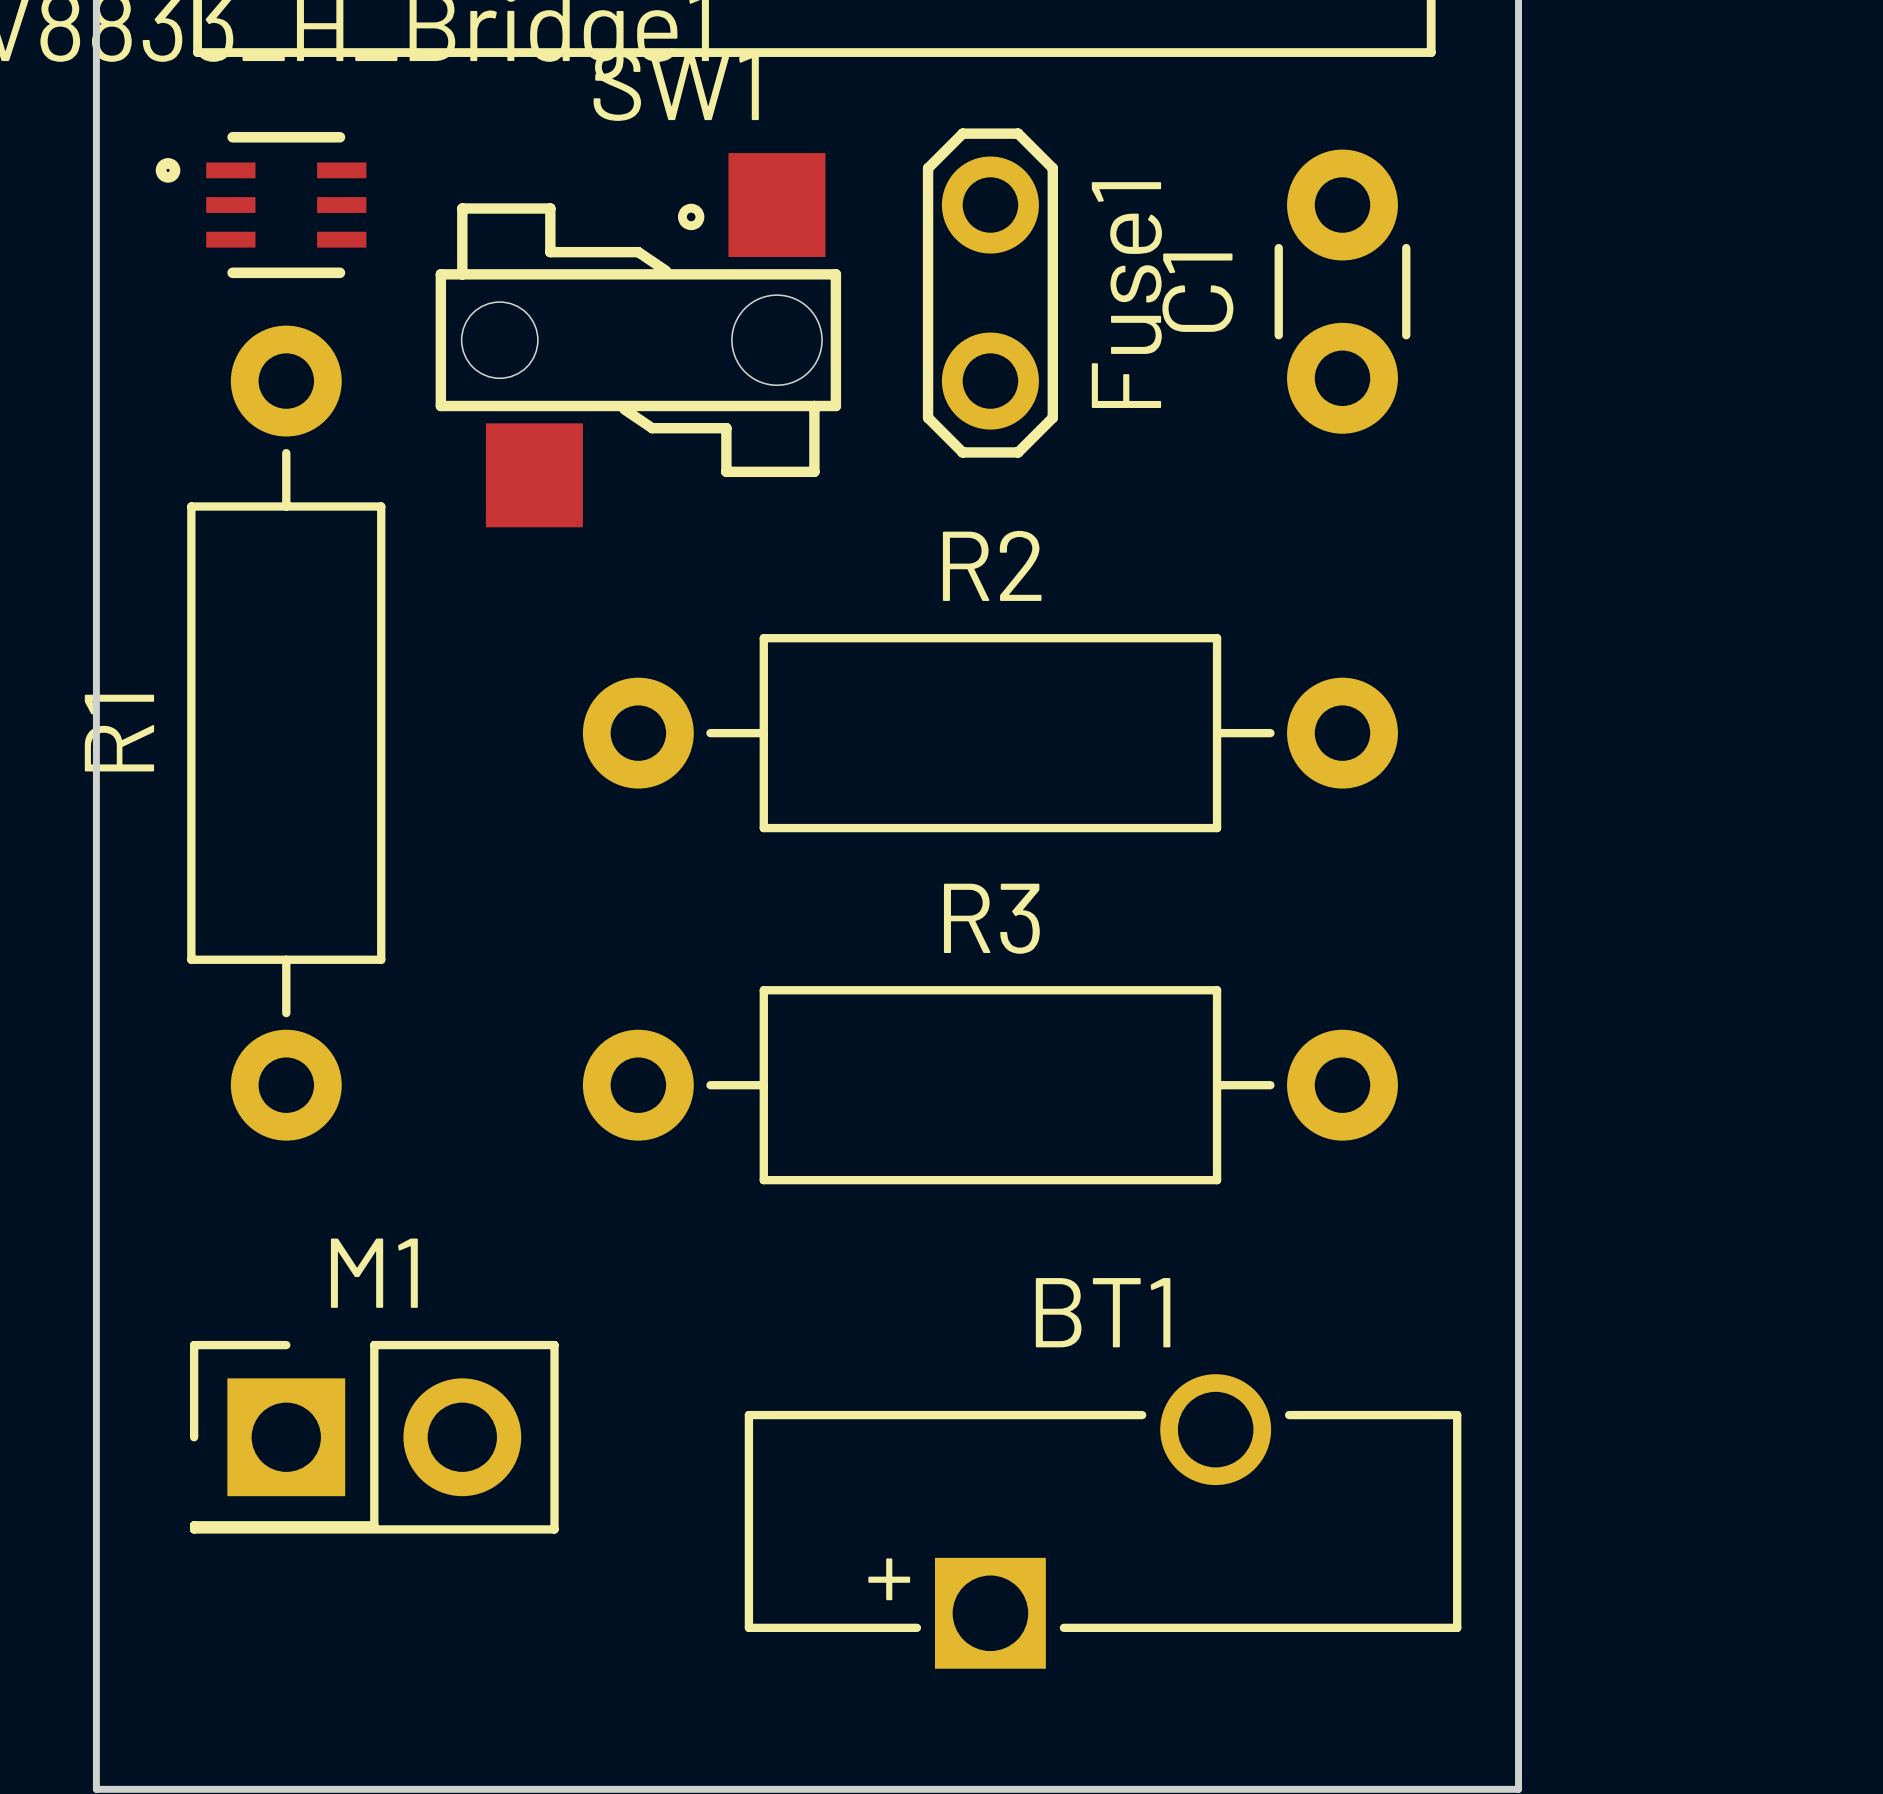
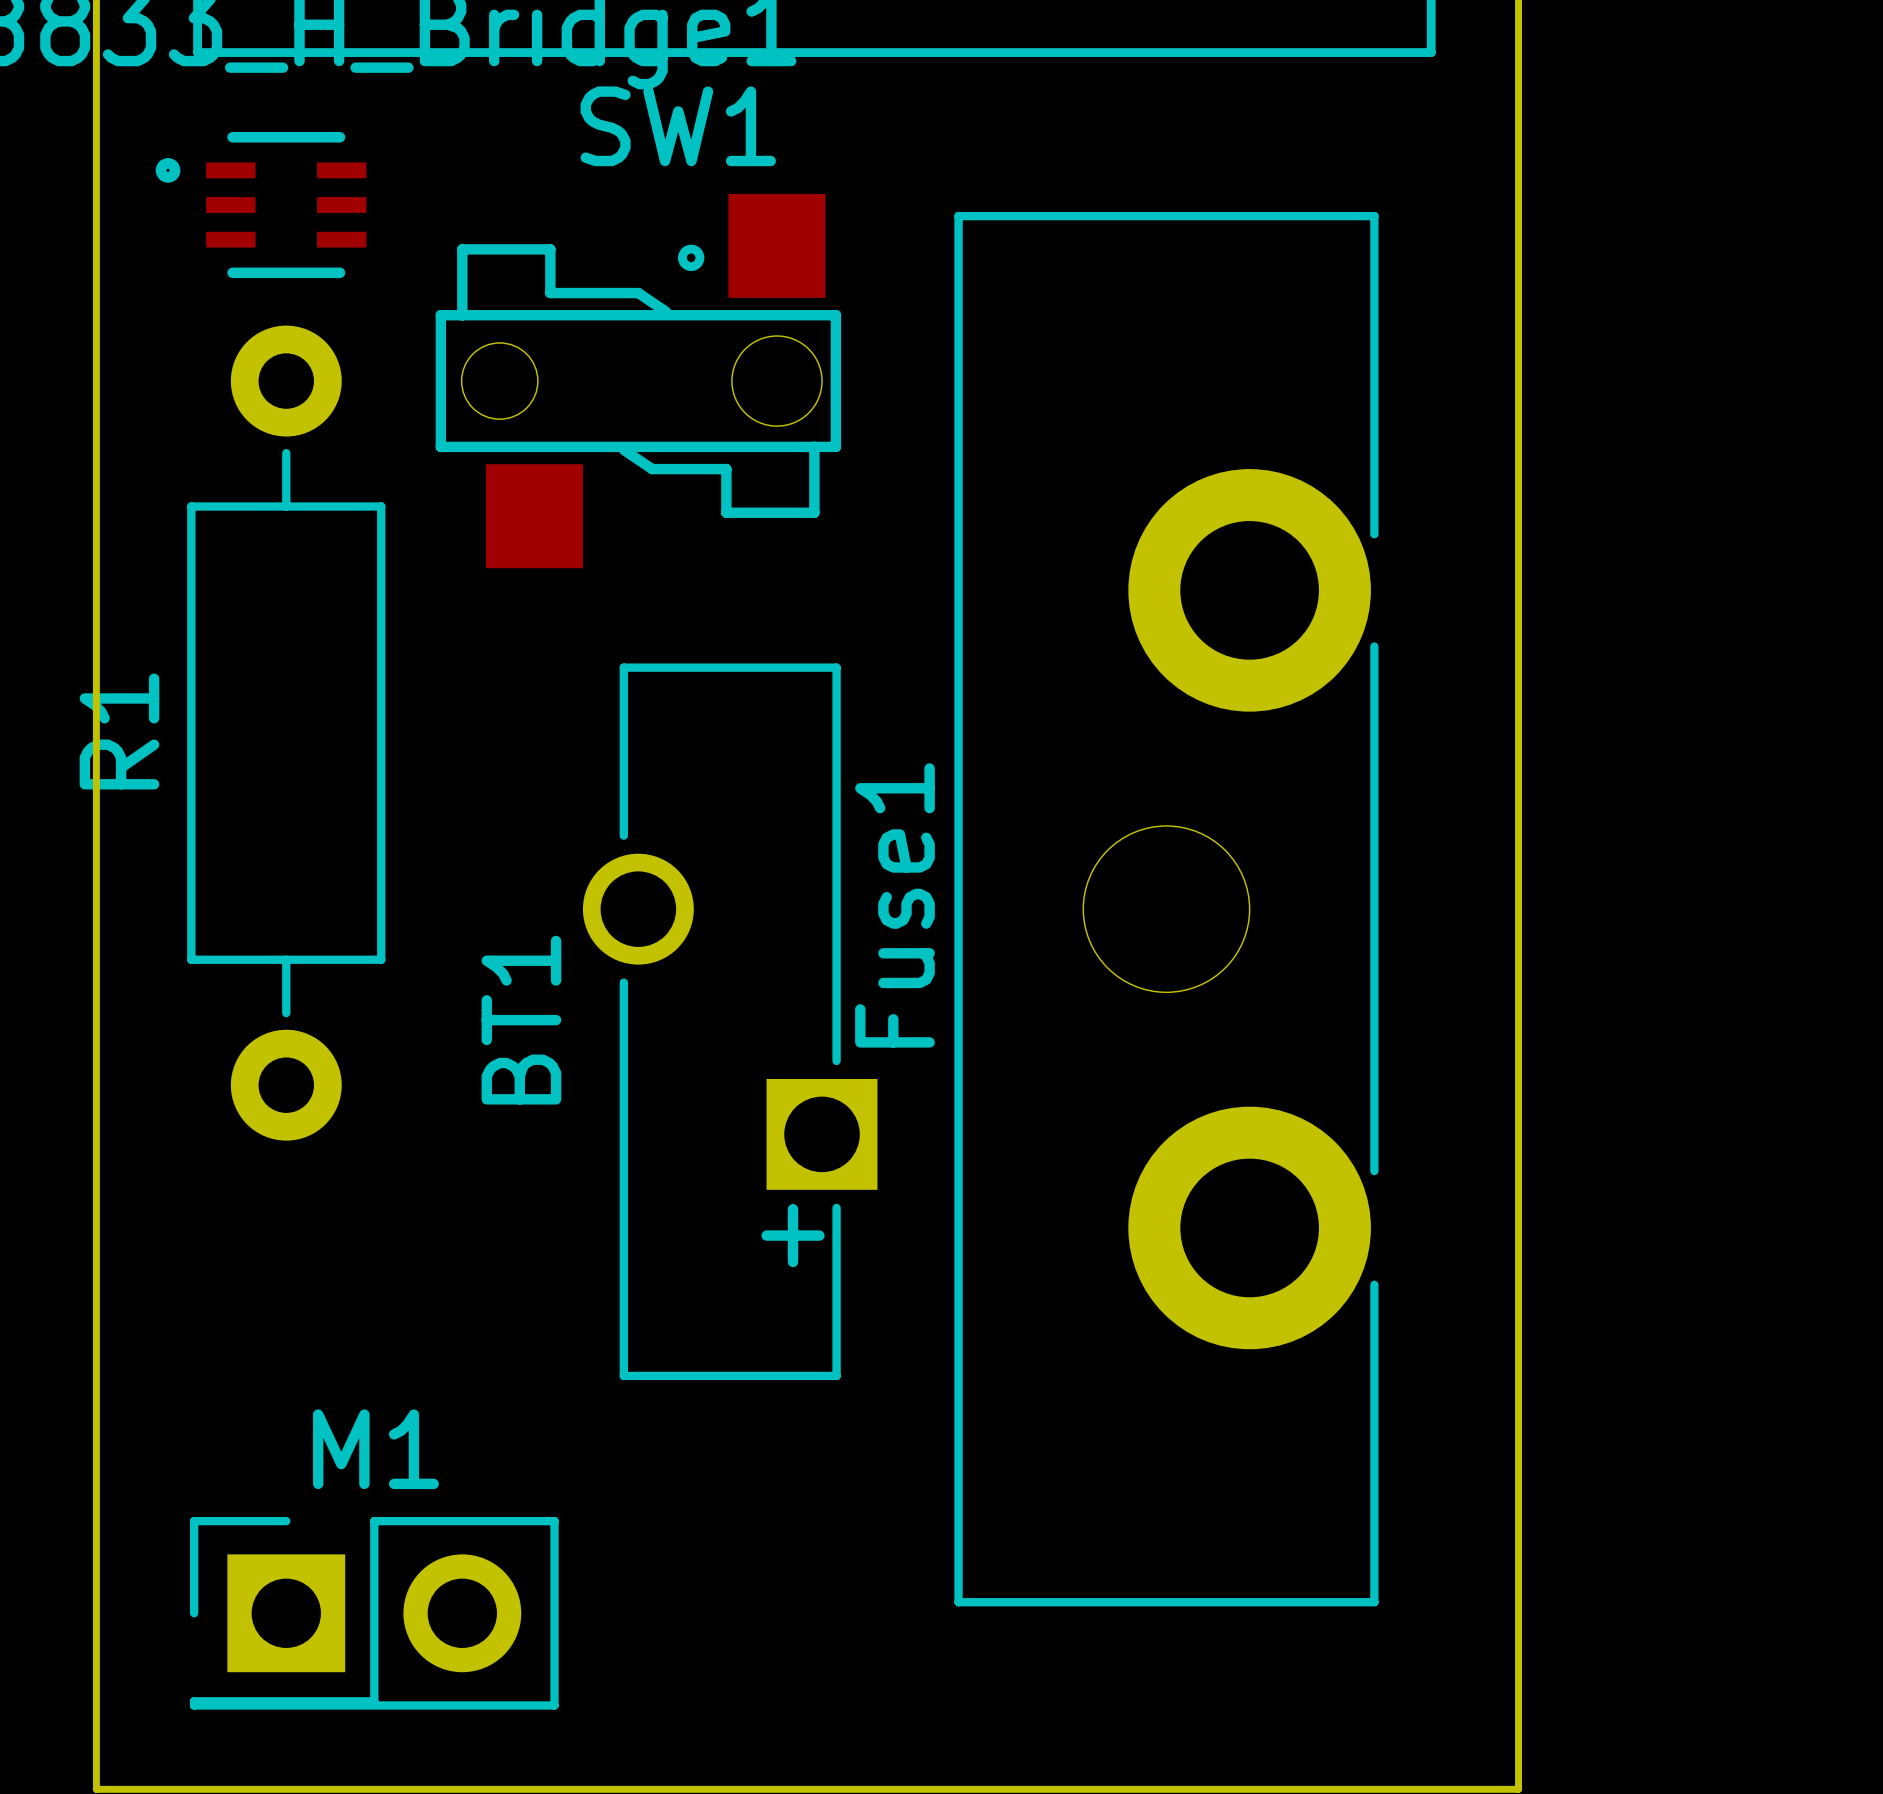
Fuse1 footprint: [922, 128, 1059, 458] -> [954, 211, 1379, 1607]
C1: (1342, 291) -> none
Fuse1 name position: Fuse1 (1126, 295) -> Fuse1 (894, 905)
SW1 position: (638, 340) -> (638, 381)
R2: (990, 733) -> none
R3: (990, 1085) -> none
M1 position: (374, 1437) -> (374, 1613)
BT1 rotation: 0° (1103, 1521) -> 90° counterclockwise (730, 1021)
BT1 position: (1103, 1521) -> (730, 1021)

